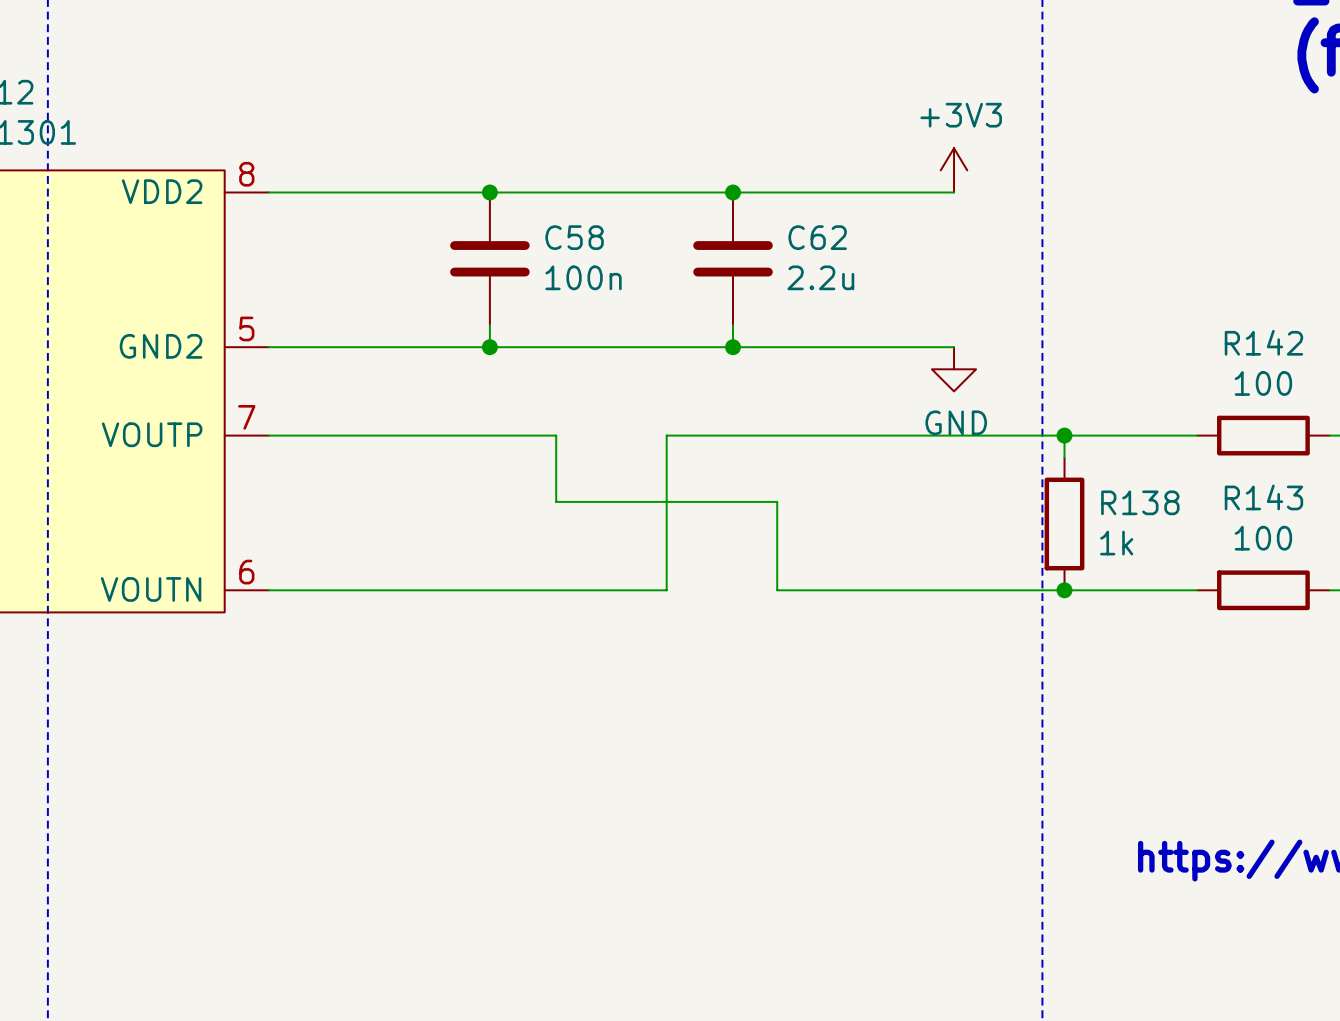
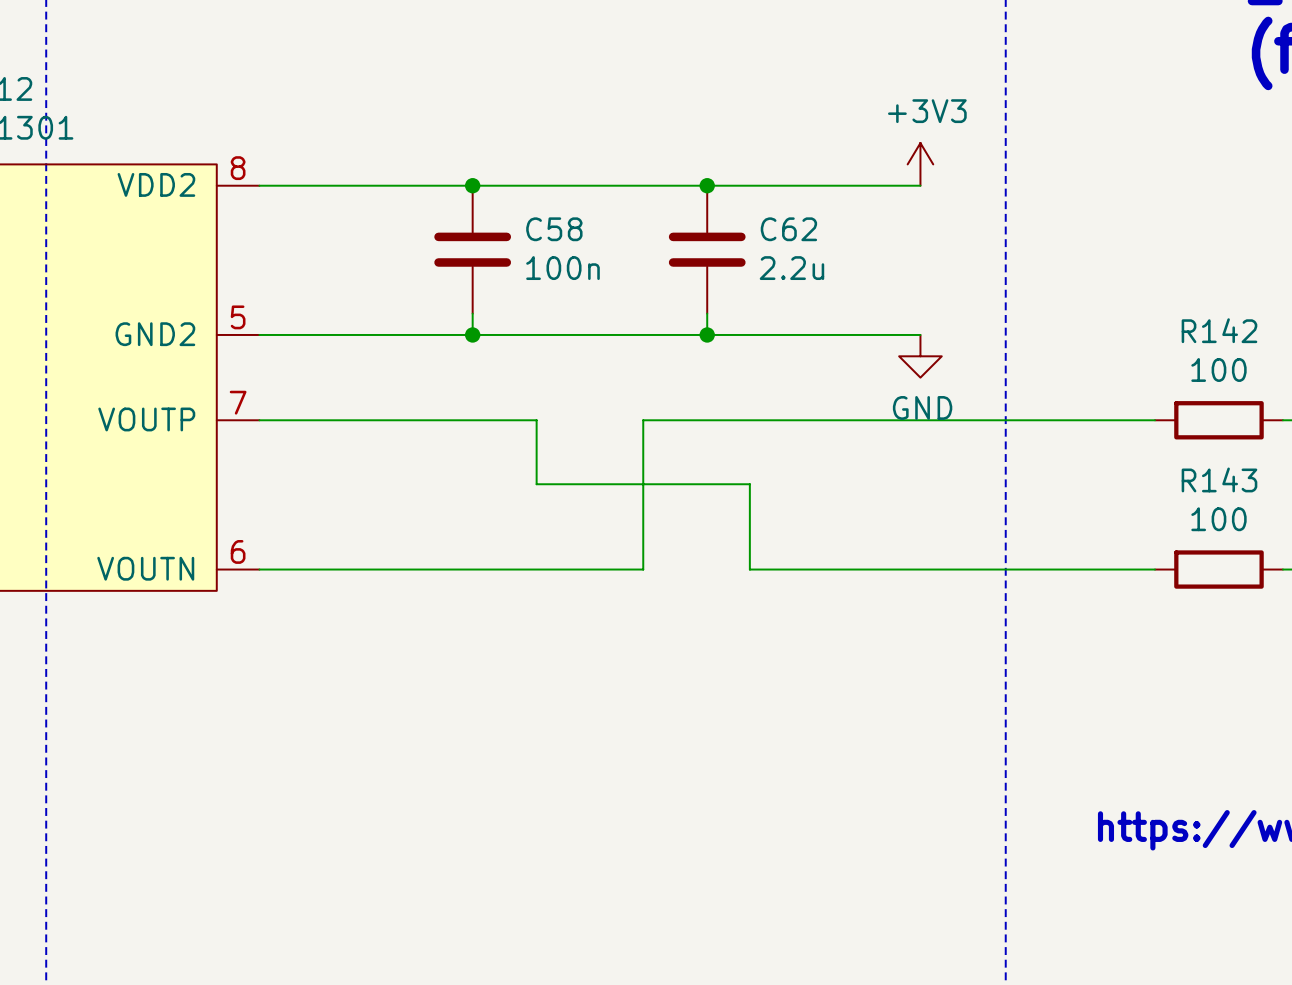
wire: (1064, 435) (1064, 457) -> none
junction: (1064, 435) -> none
R138: 1k (1064, 524) -> none
junction: (1064, 590) -> none

